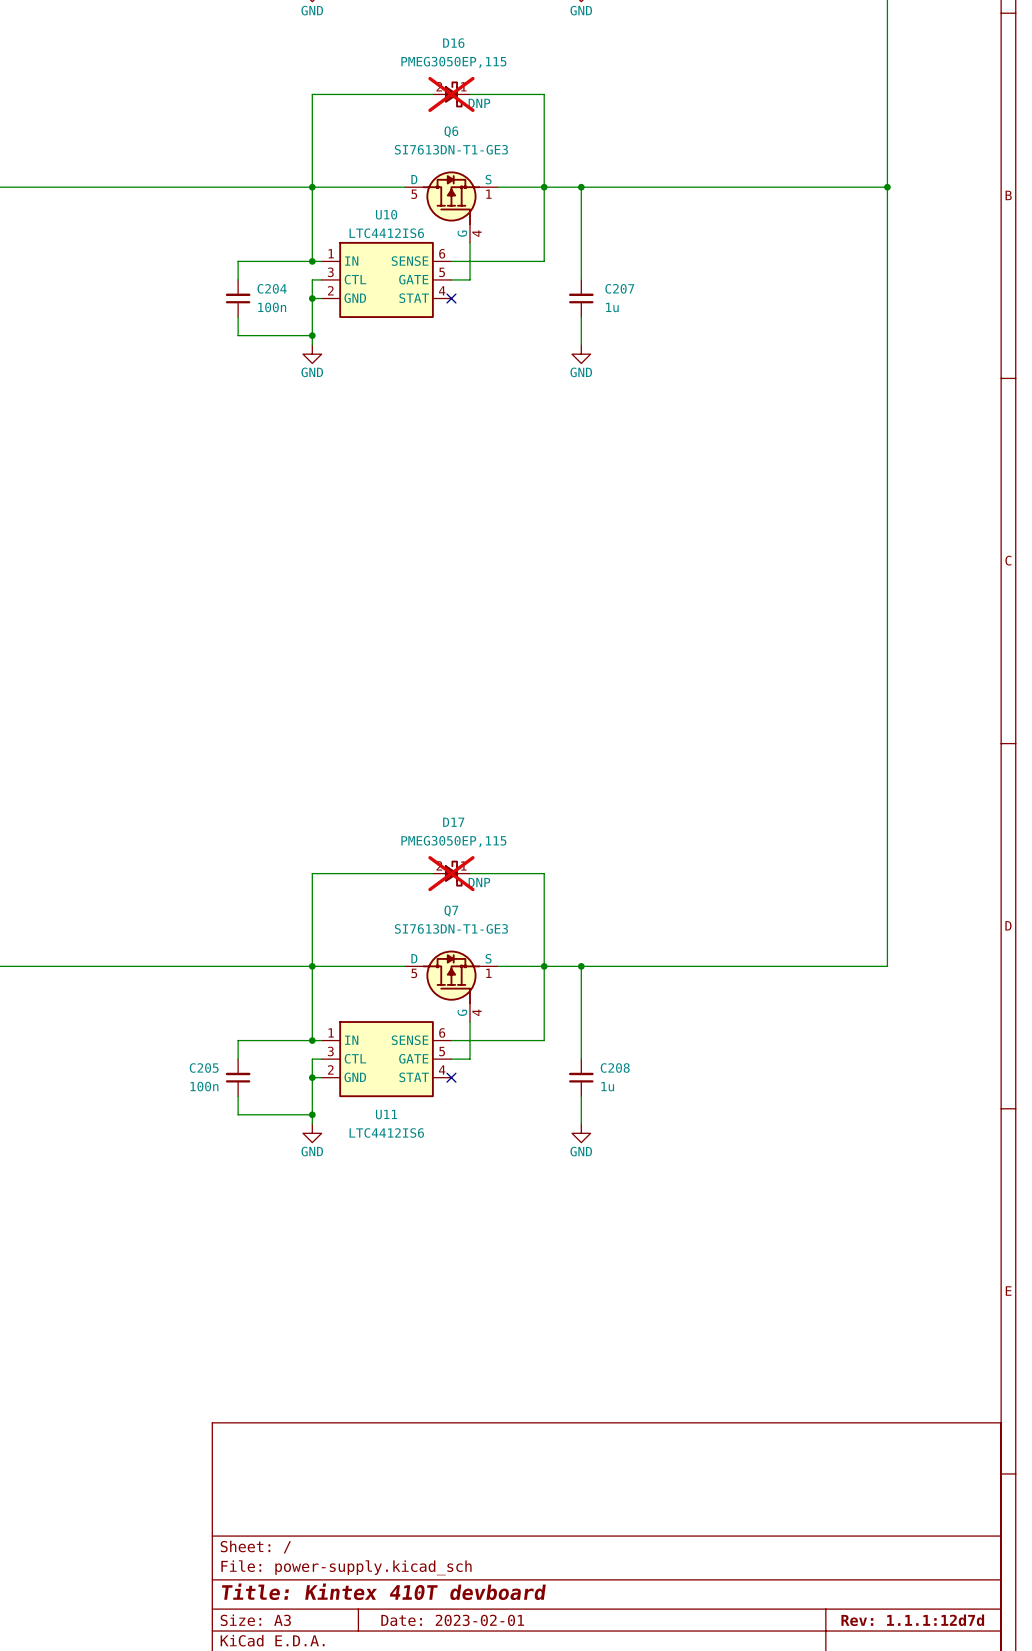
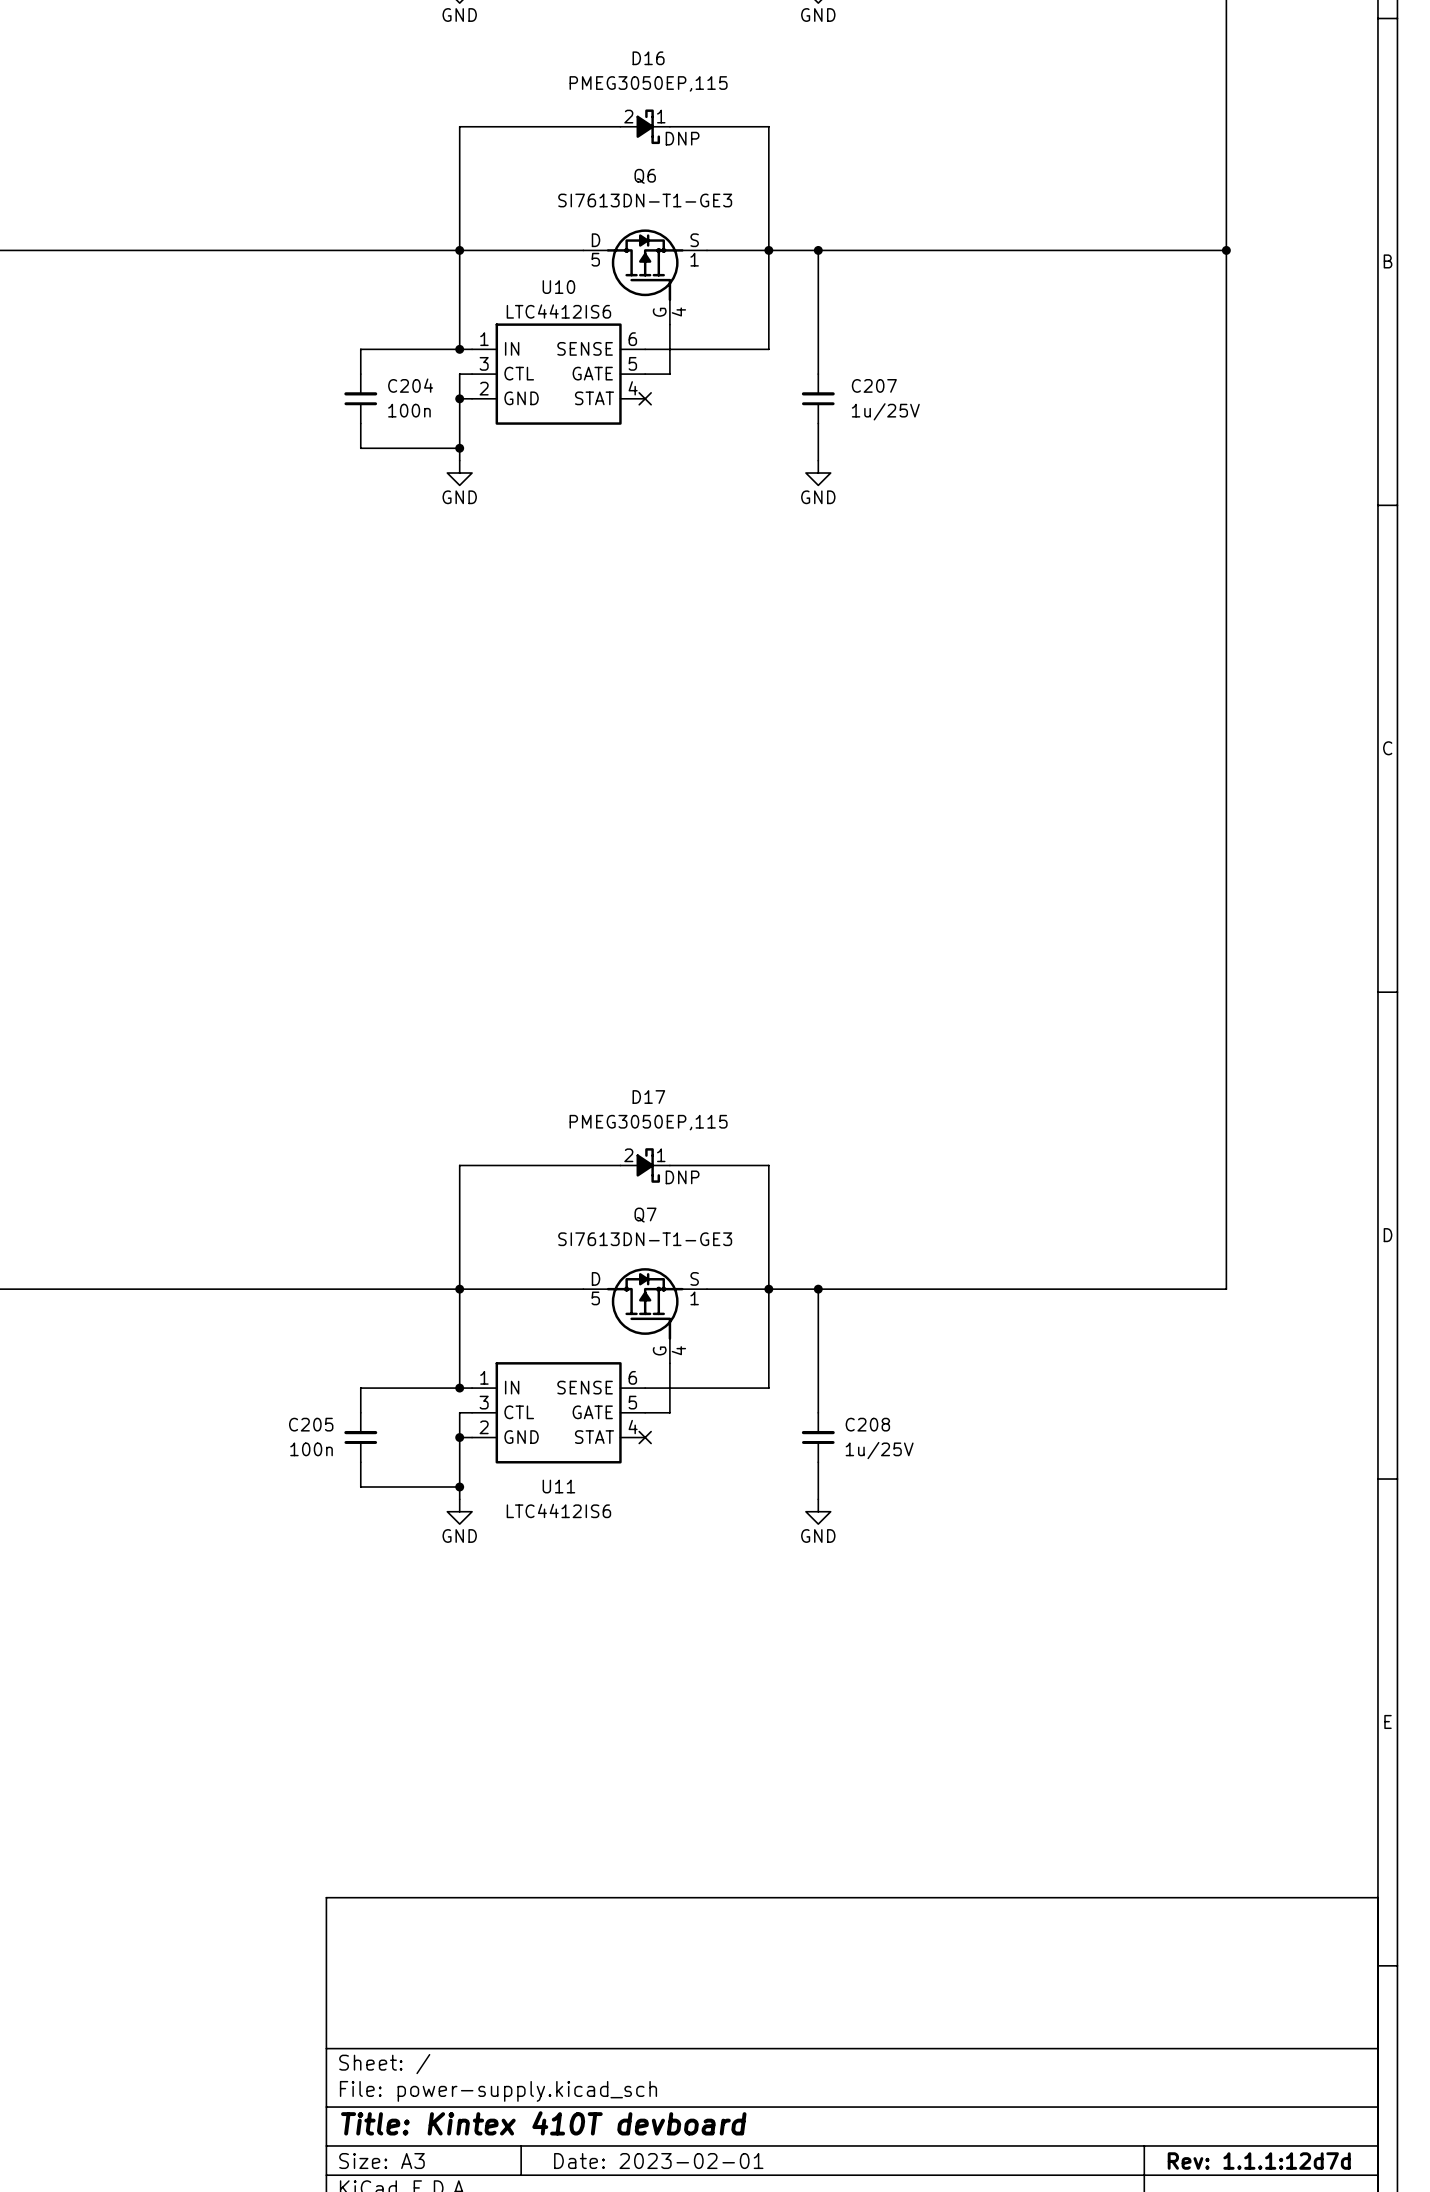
D16 do-not-place cross: (451, 94) -> none
C207 text: 1u (612, 307) -> 1u/25V (885, 411)
D17 do-not-place cross: (451, 873) -> none
C208 text: 1u (607, 1086) -> 1u/25V (879, 1450)

